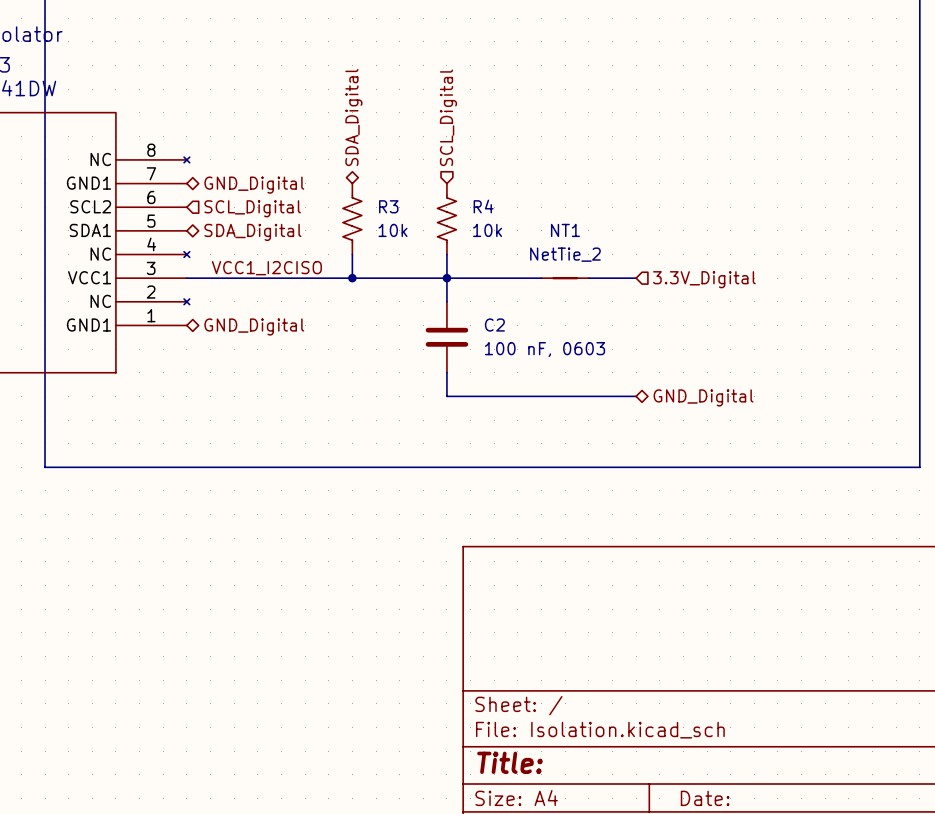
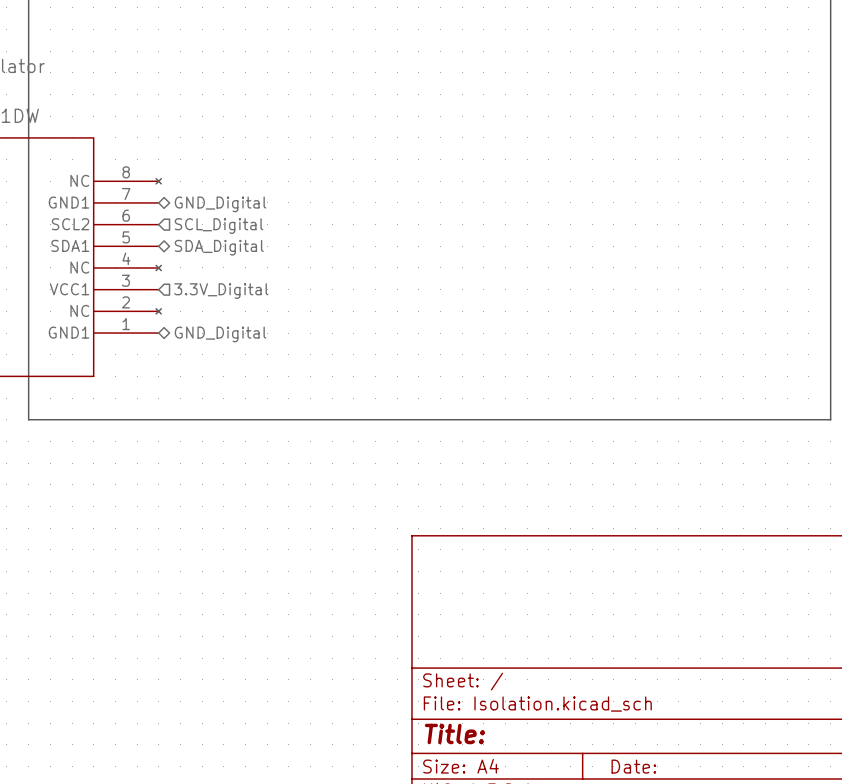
hierarchical label: SDA_Digital (353, 117) -> none
hierarchical label: SCL_Digital (448, 117) -> none
R3: 10k (352, 219) -> none
R4: 10k (446, 219) -> none
wire: (352, 254) (352, 278) -> none
wire: (446, 254) (446, 301) -> none
label: VCC1_I2CISO (266, 268) -> none
wire: (186, 278) (541, 278) -> none
junction: (352, 278) -> none
junction: (446, 278) -> none
NT1: NetTie_2 (565, 278) -> none
wire: (588, 278) (636, 278) -> none
hierarchical label: none -> 3.3V_Digital (221, 291)
hierarchical label: 3.3V_Digital (704, 279) -> none
C2: 100 nF, 0603 (446, 337) -> none
wire: (446, 372) (446, 396) (636, 396) -> none
hierarchical label: GND_Digital (703, 397) -> none
line: (45, 420) (45, 467) (919, 467) (919, 420) -> (28, 419) (830, 419)

